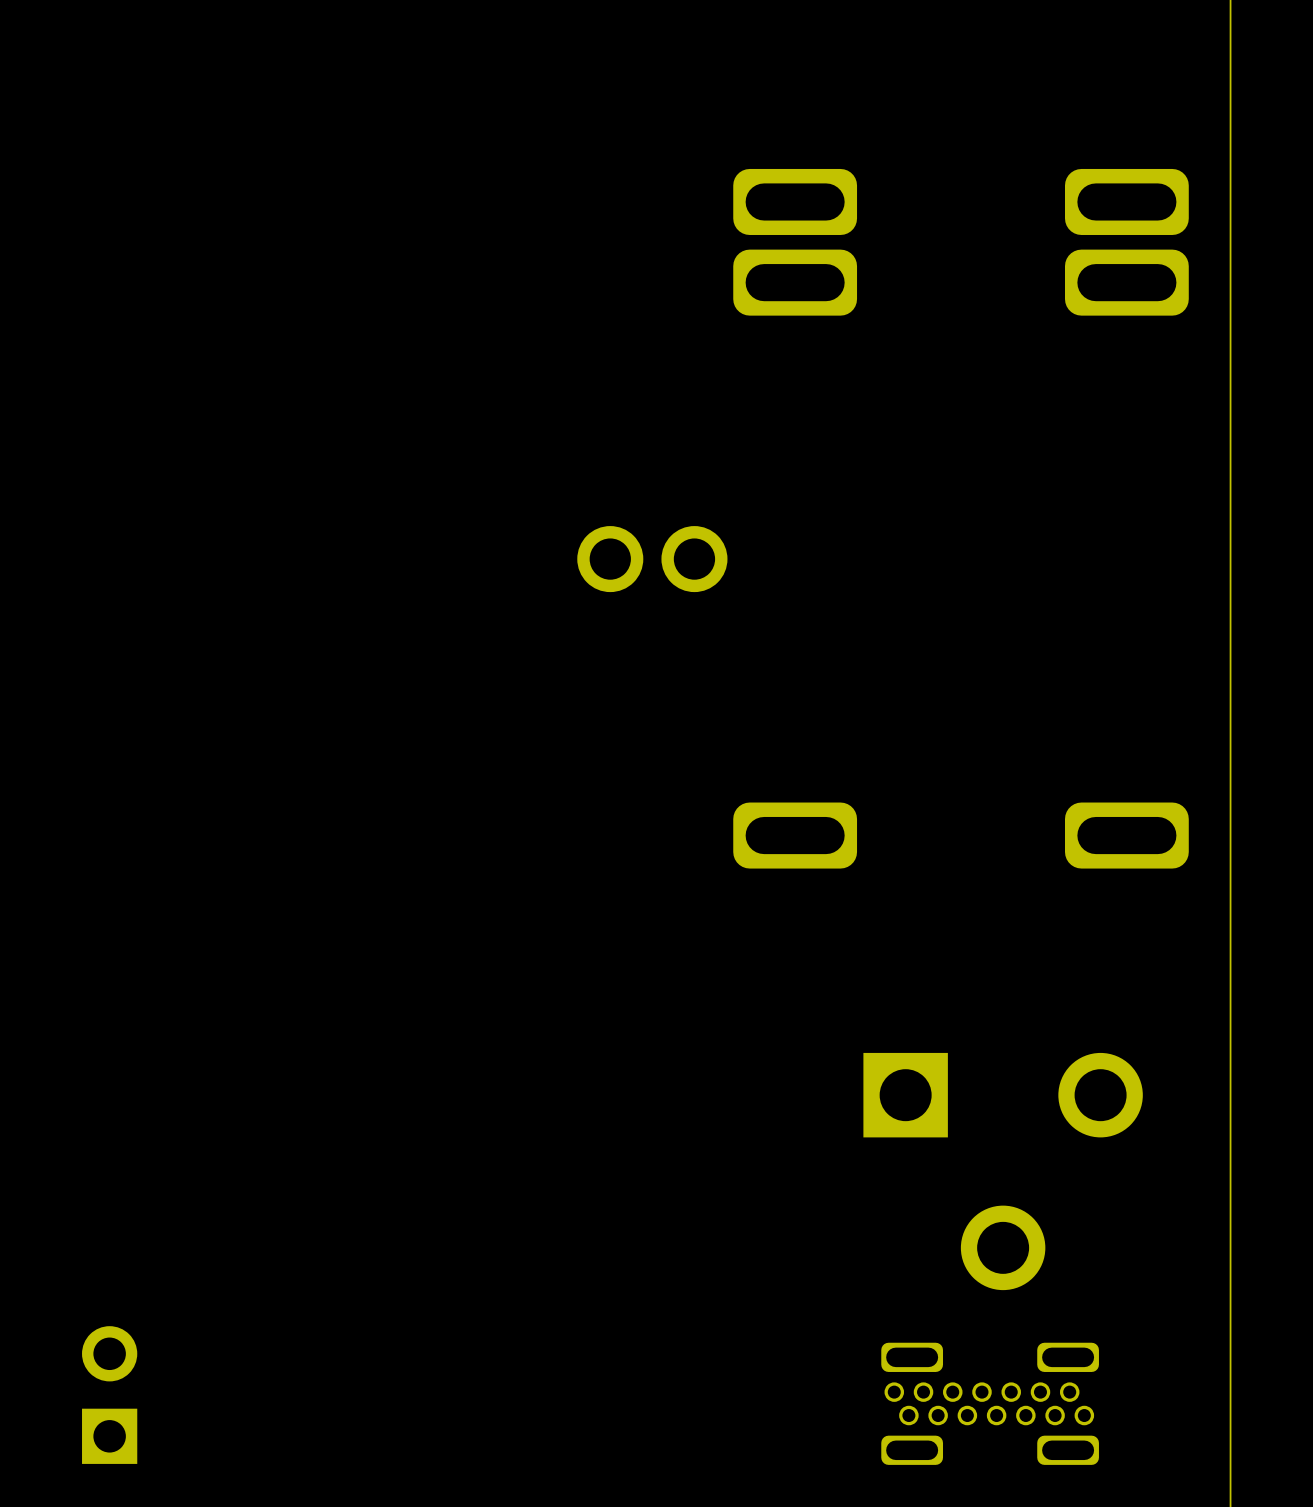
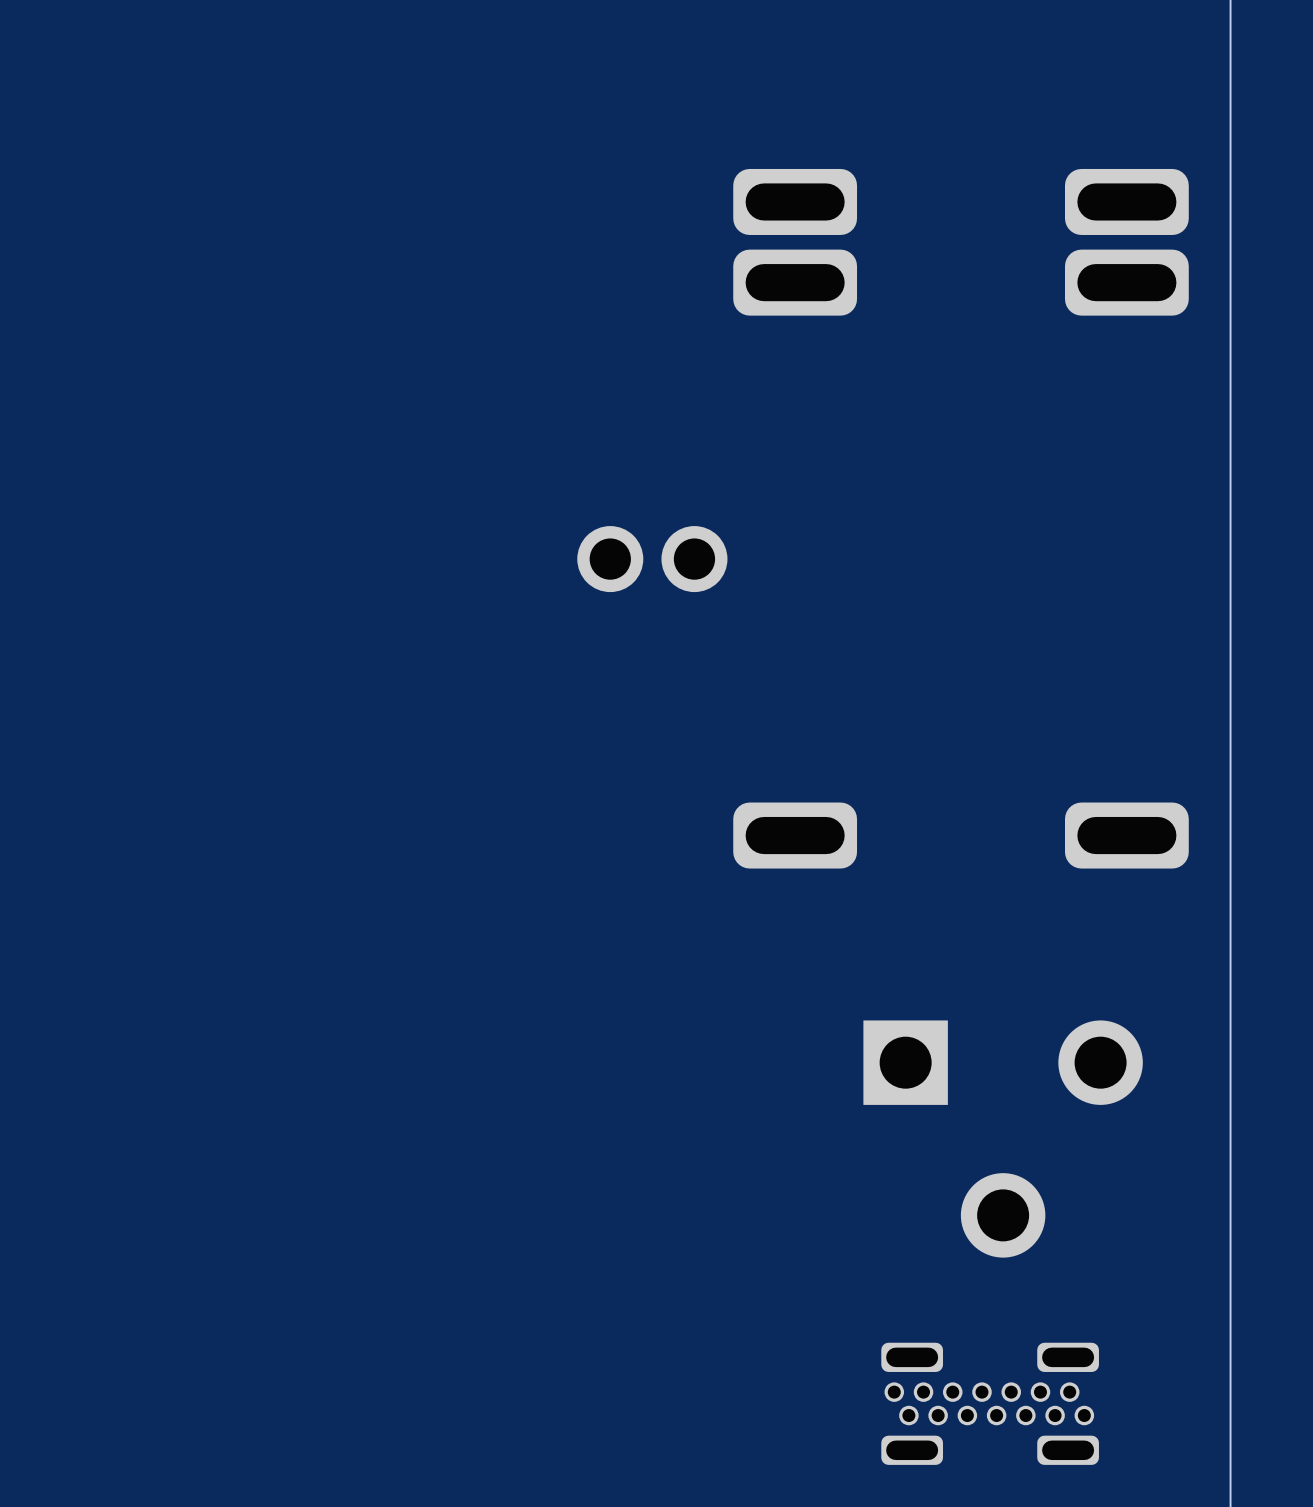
part position: (1003, 1171) -> (1003, 1139)
part: (109, 1395) -> none

